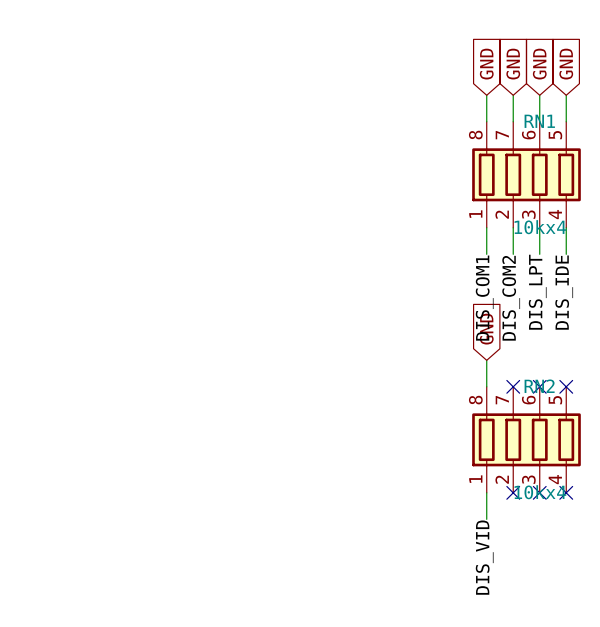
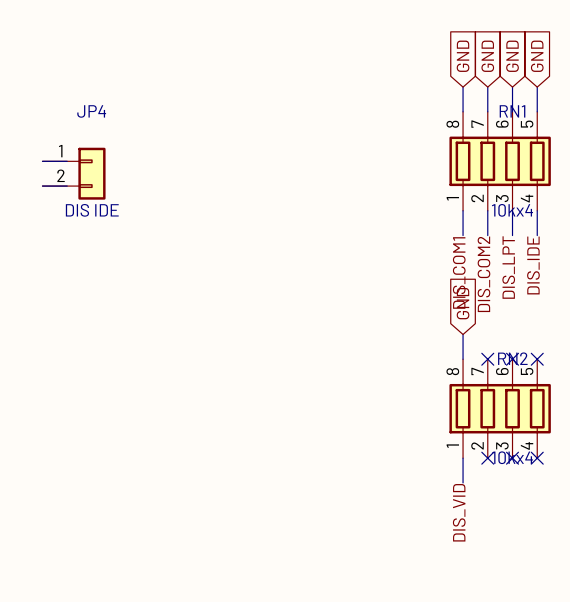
wire: none -> (42, 161) (67, 161)
JP4: none -> DIS IDE (74, 173)
wire: none -> (42, 186) (67, 186)

